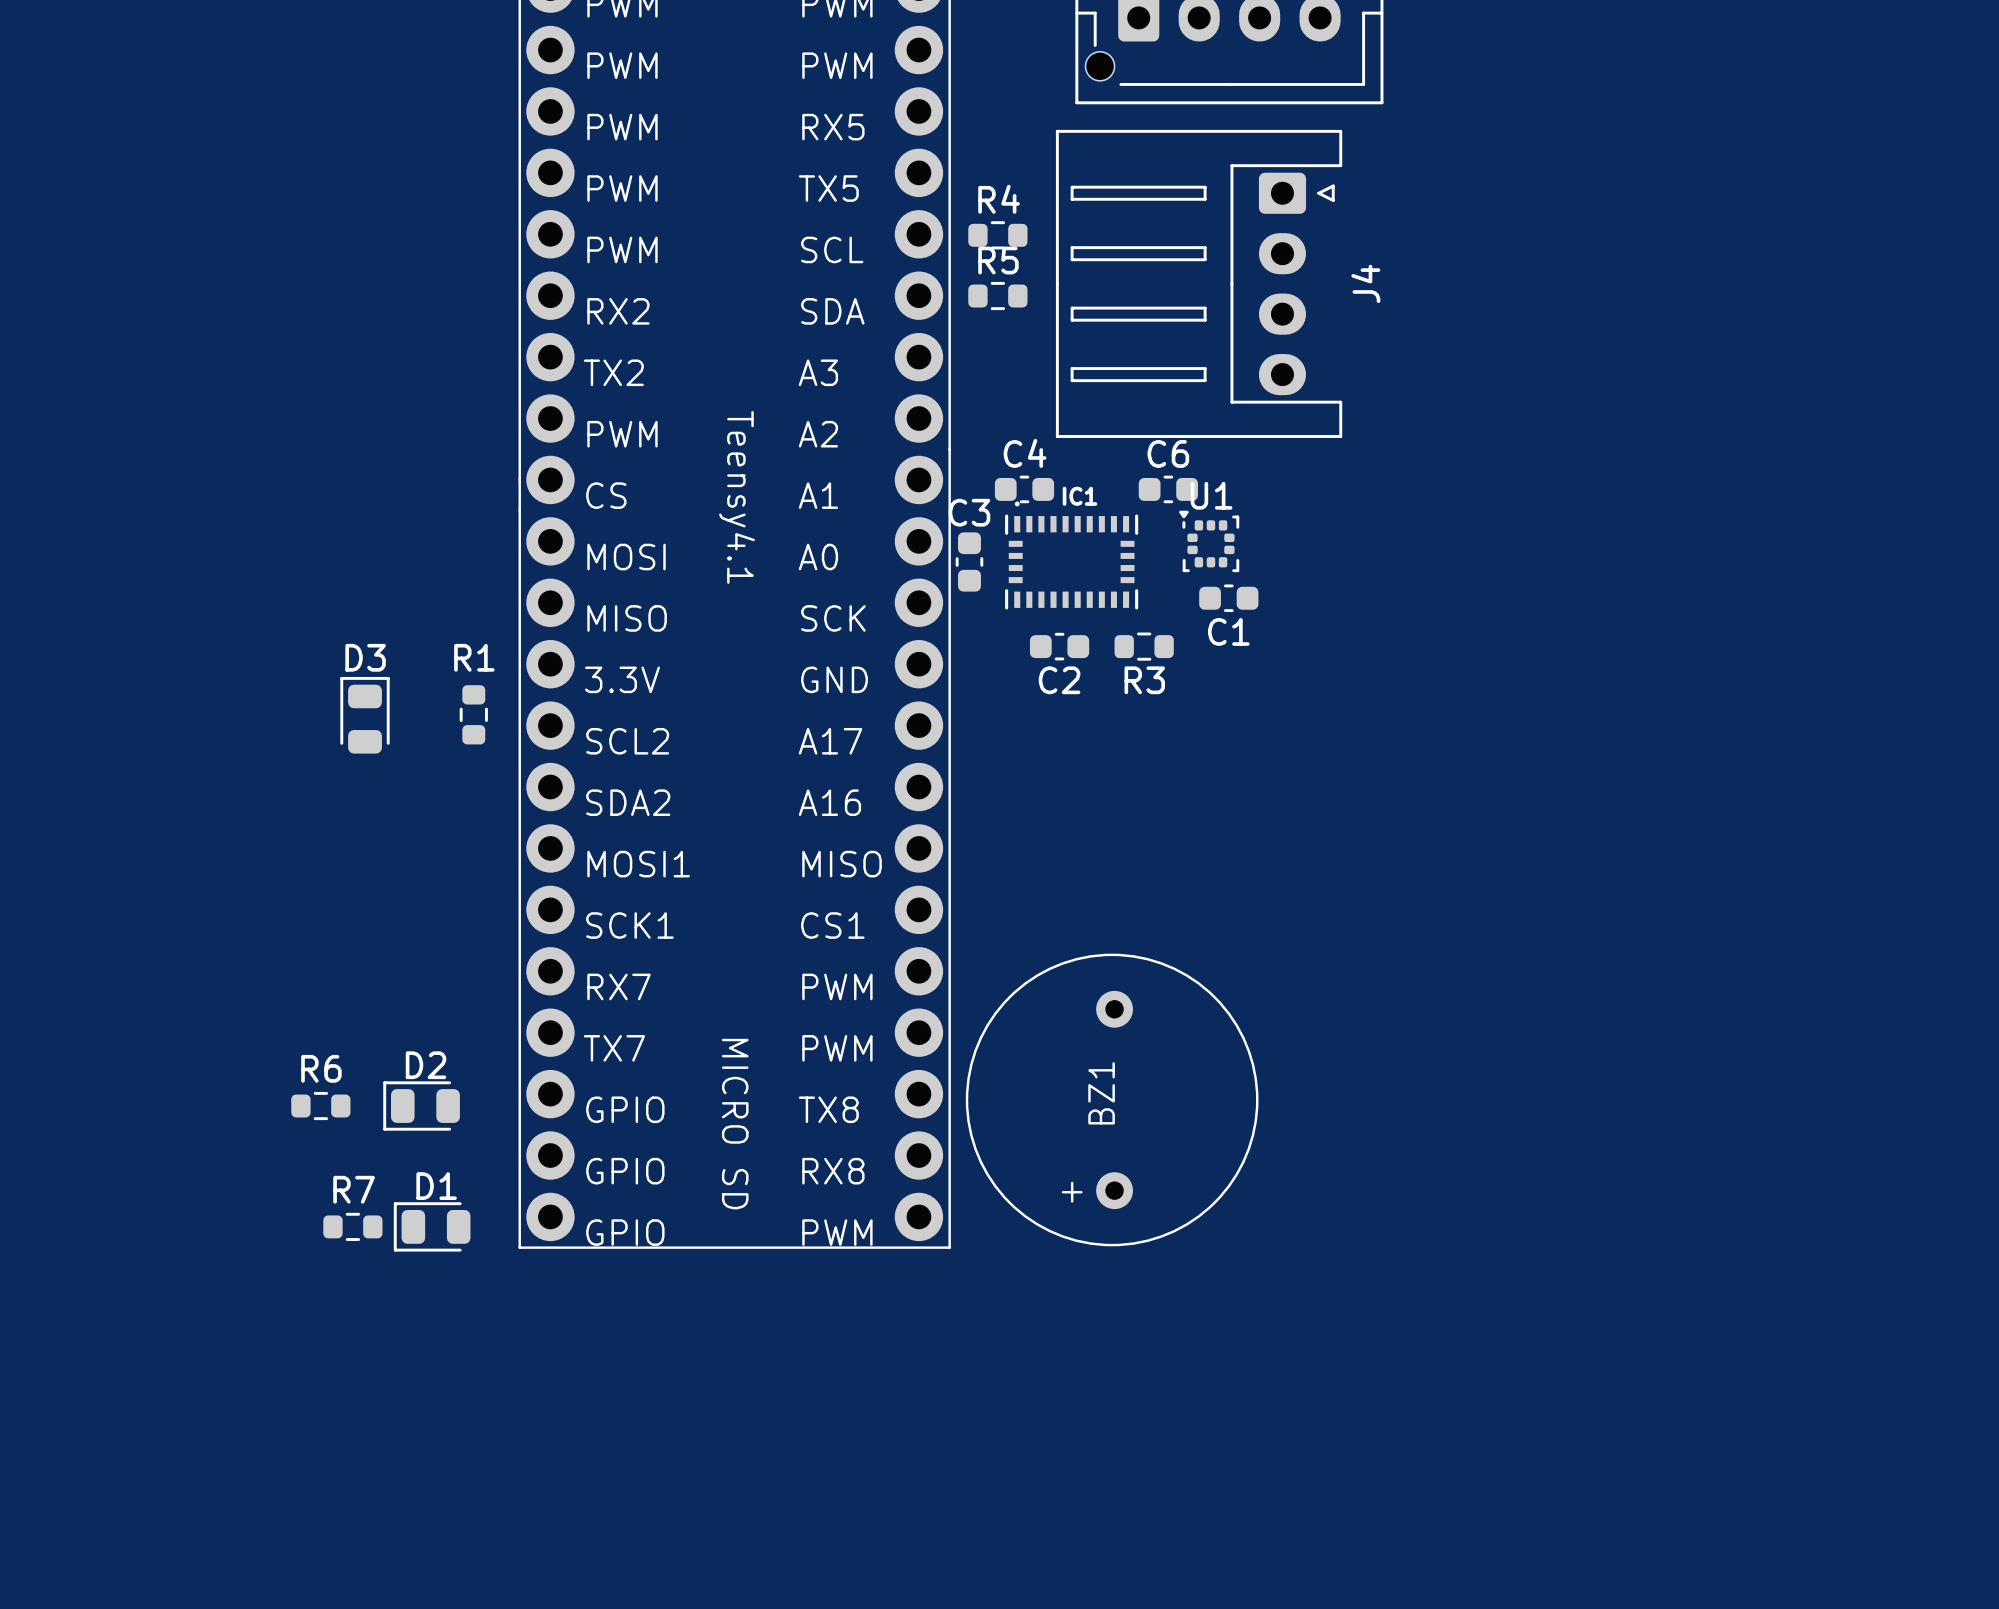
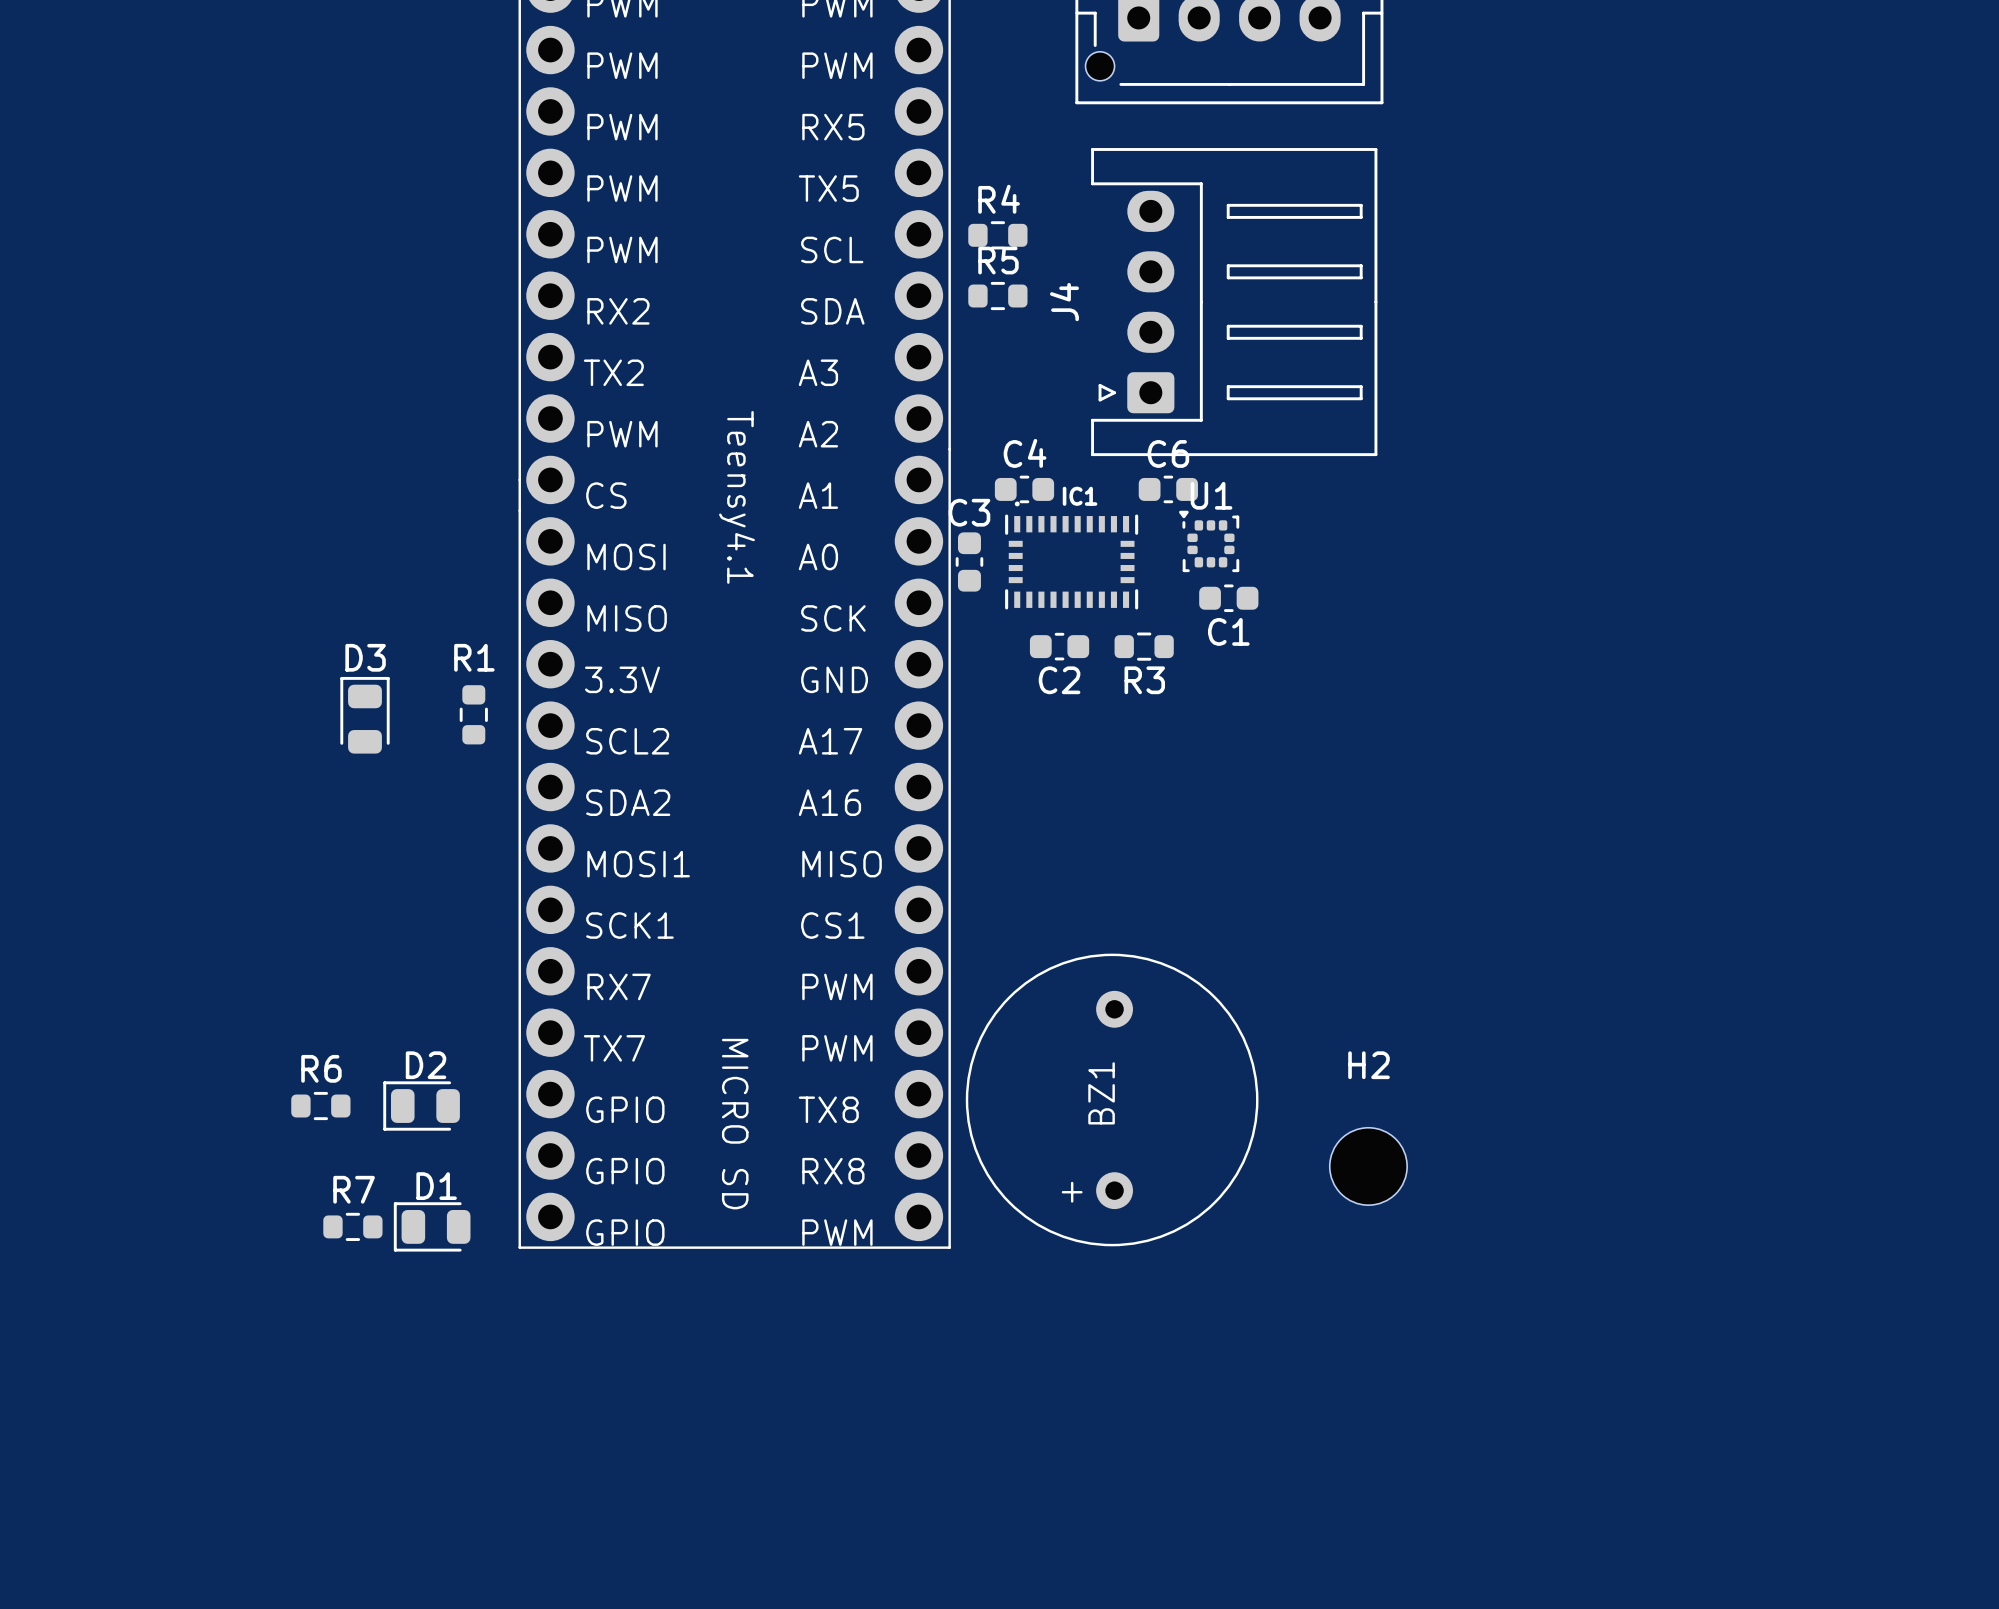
J4 rotation: 0° (1199, 283) -> 180° (1234, 302)
H2: none -> (1368, 1166)

